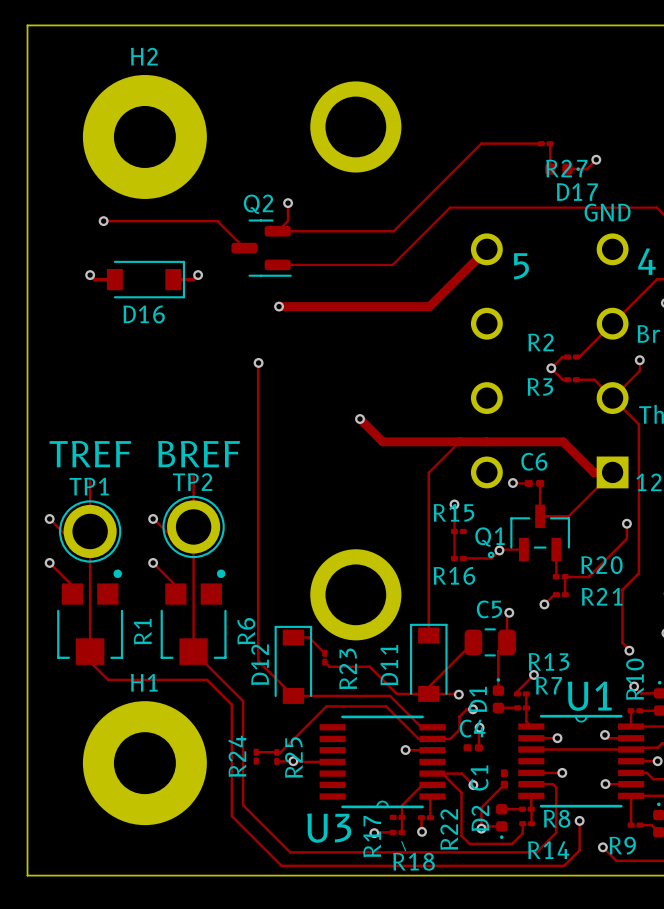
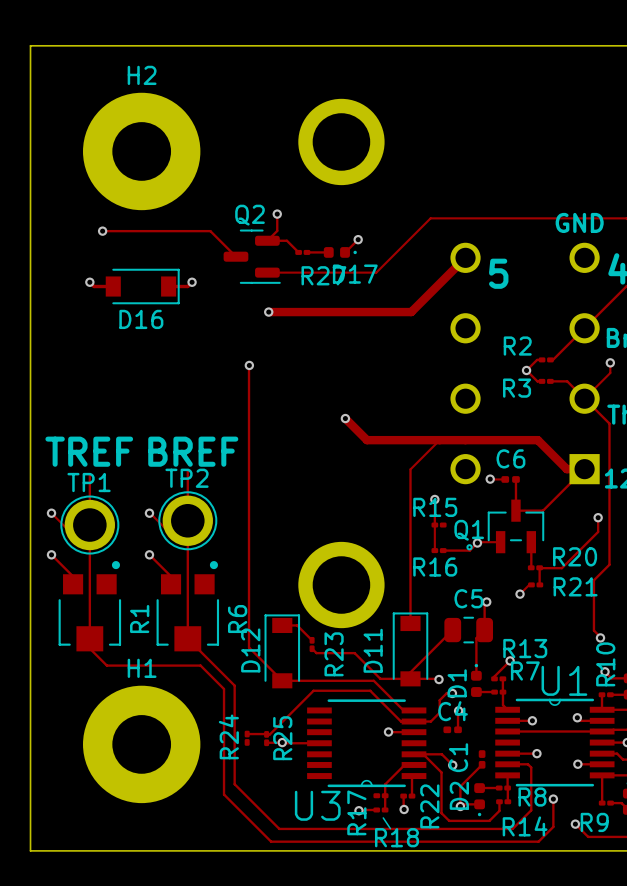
track: (541, 143) (481, 143) (393, 231) (298, 231) -> (298, 252) (286, 240)
R27 position: (545, 143) -> (302, 252)
track: (550, 143) (550, 169) -> none
track: (596, 158) (586, 169) (567, 169) -> none
via: (596, 159) -> none
D17 position: (562, 169) -> (340, 252)
track: none -> (358, 239) (345, 252)
via: none -> (358, 239)
track: none -> (307, 252) (328, 252)

